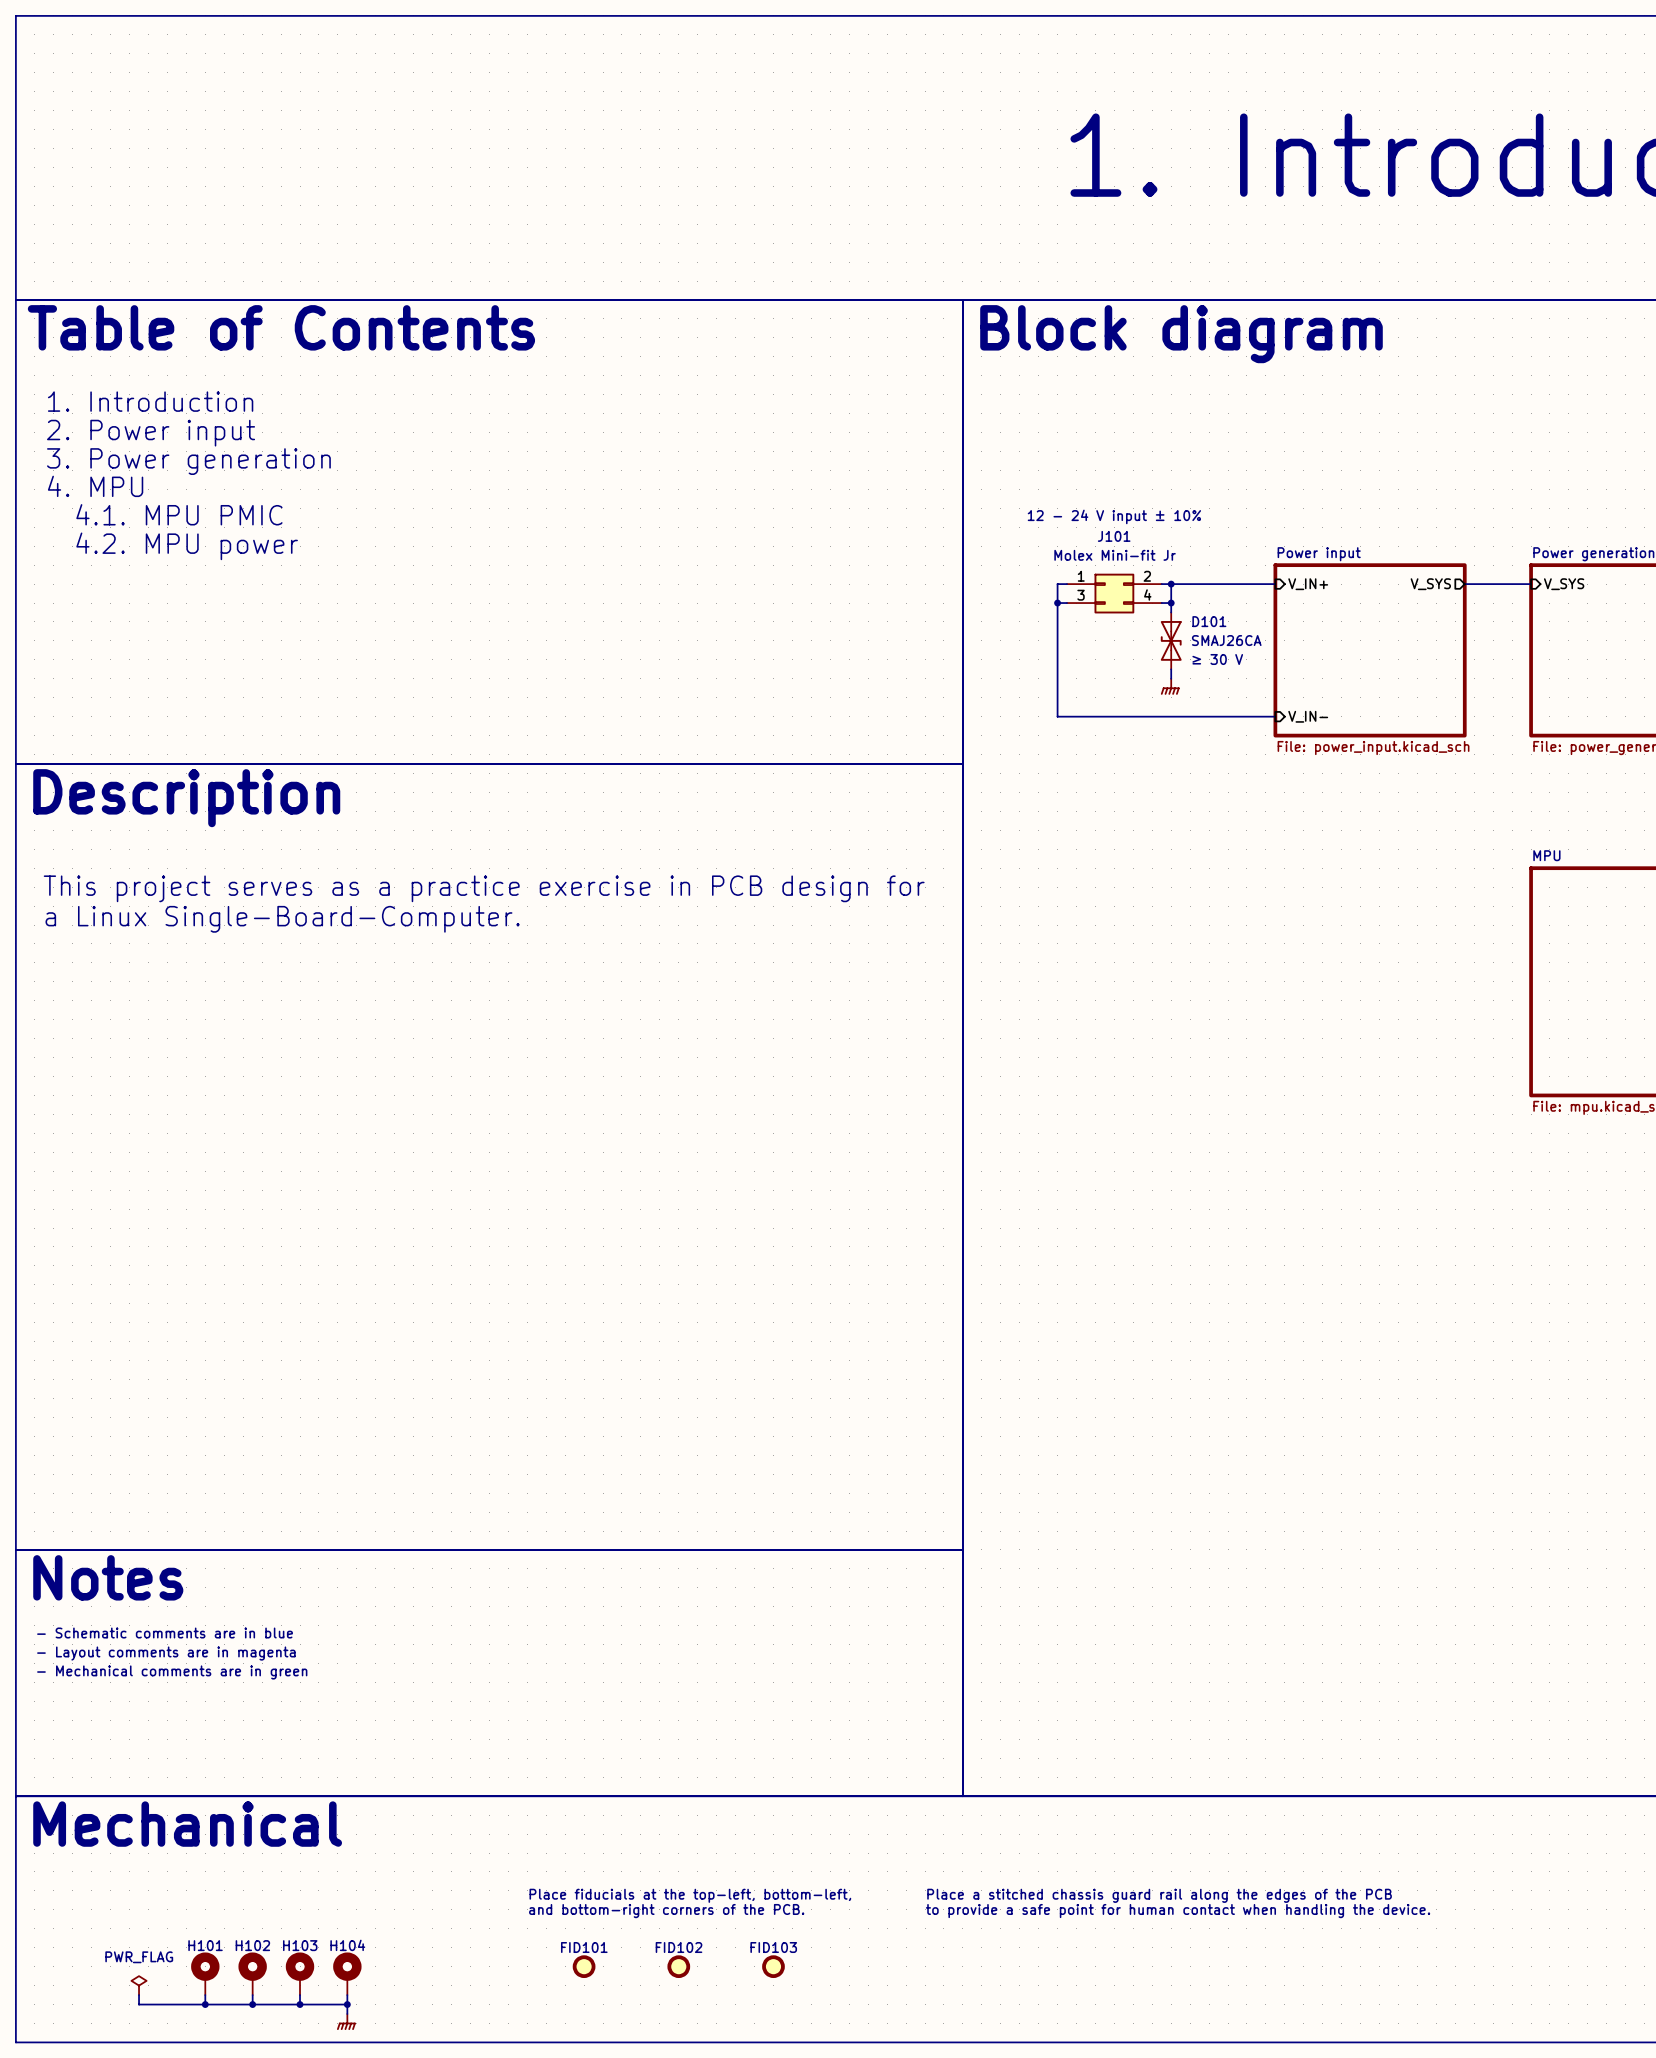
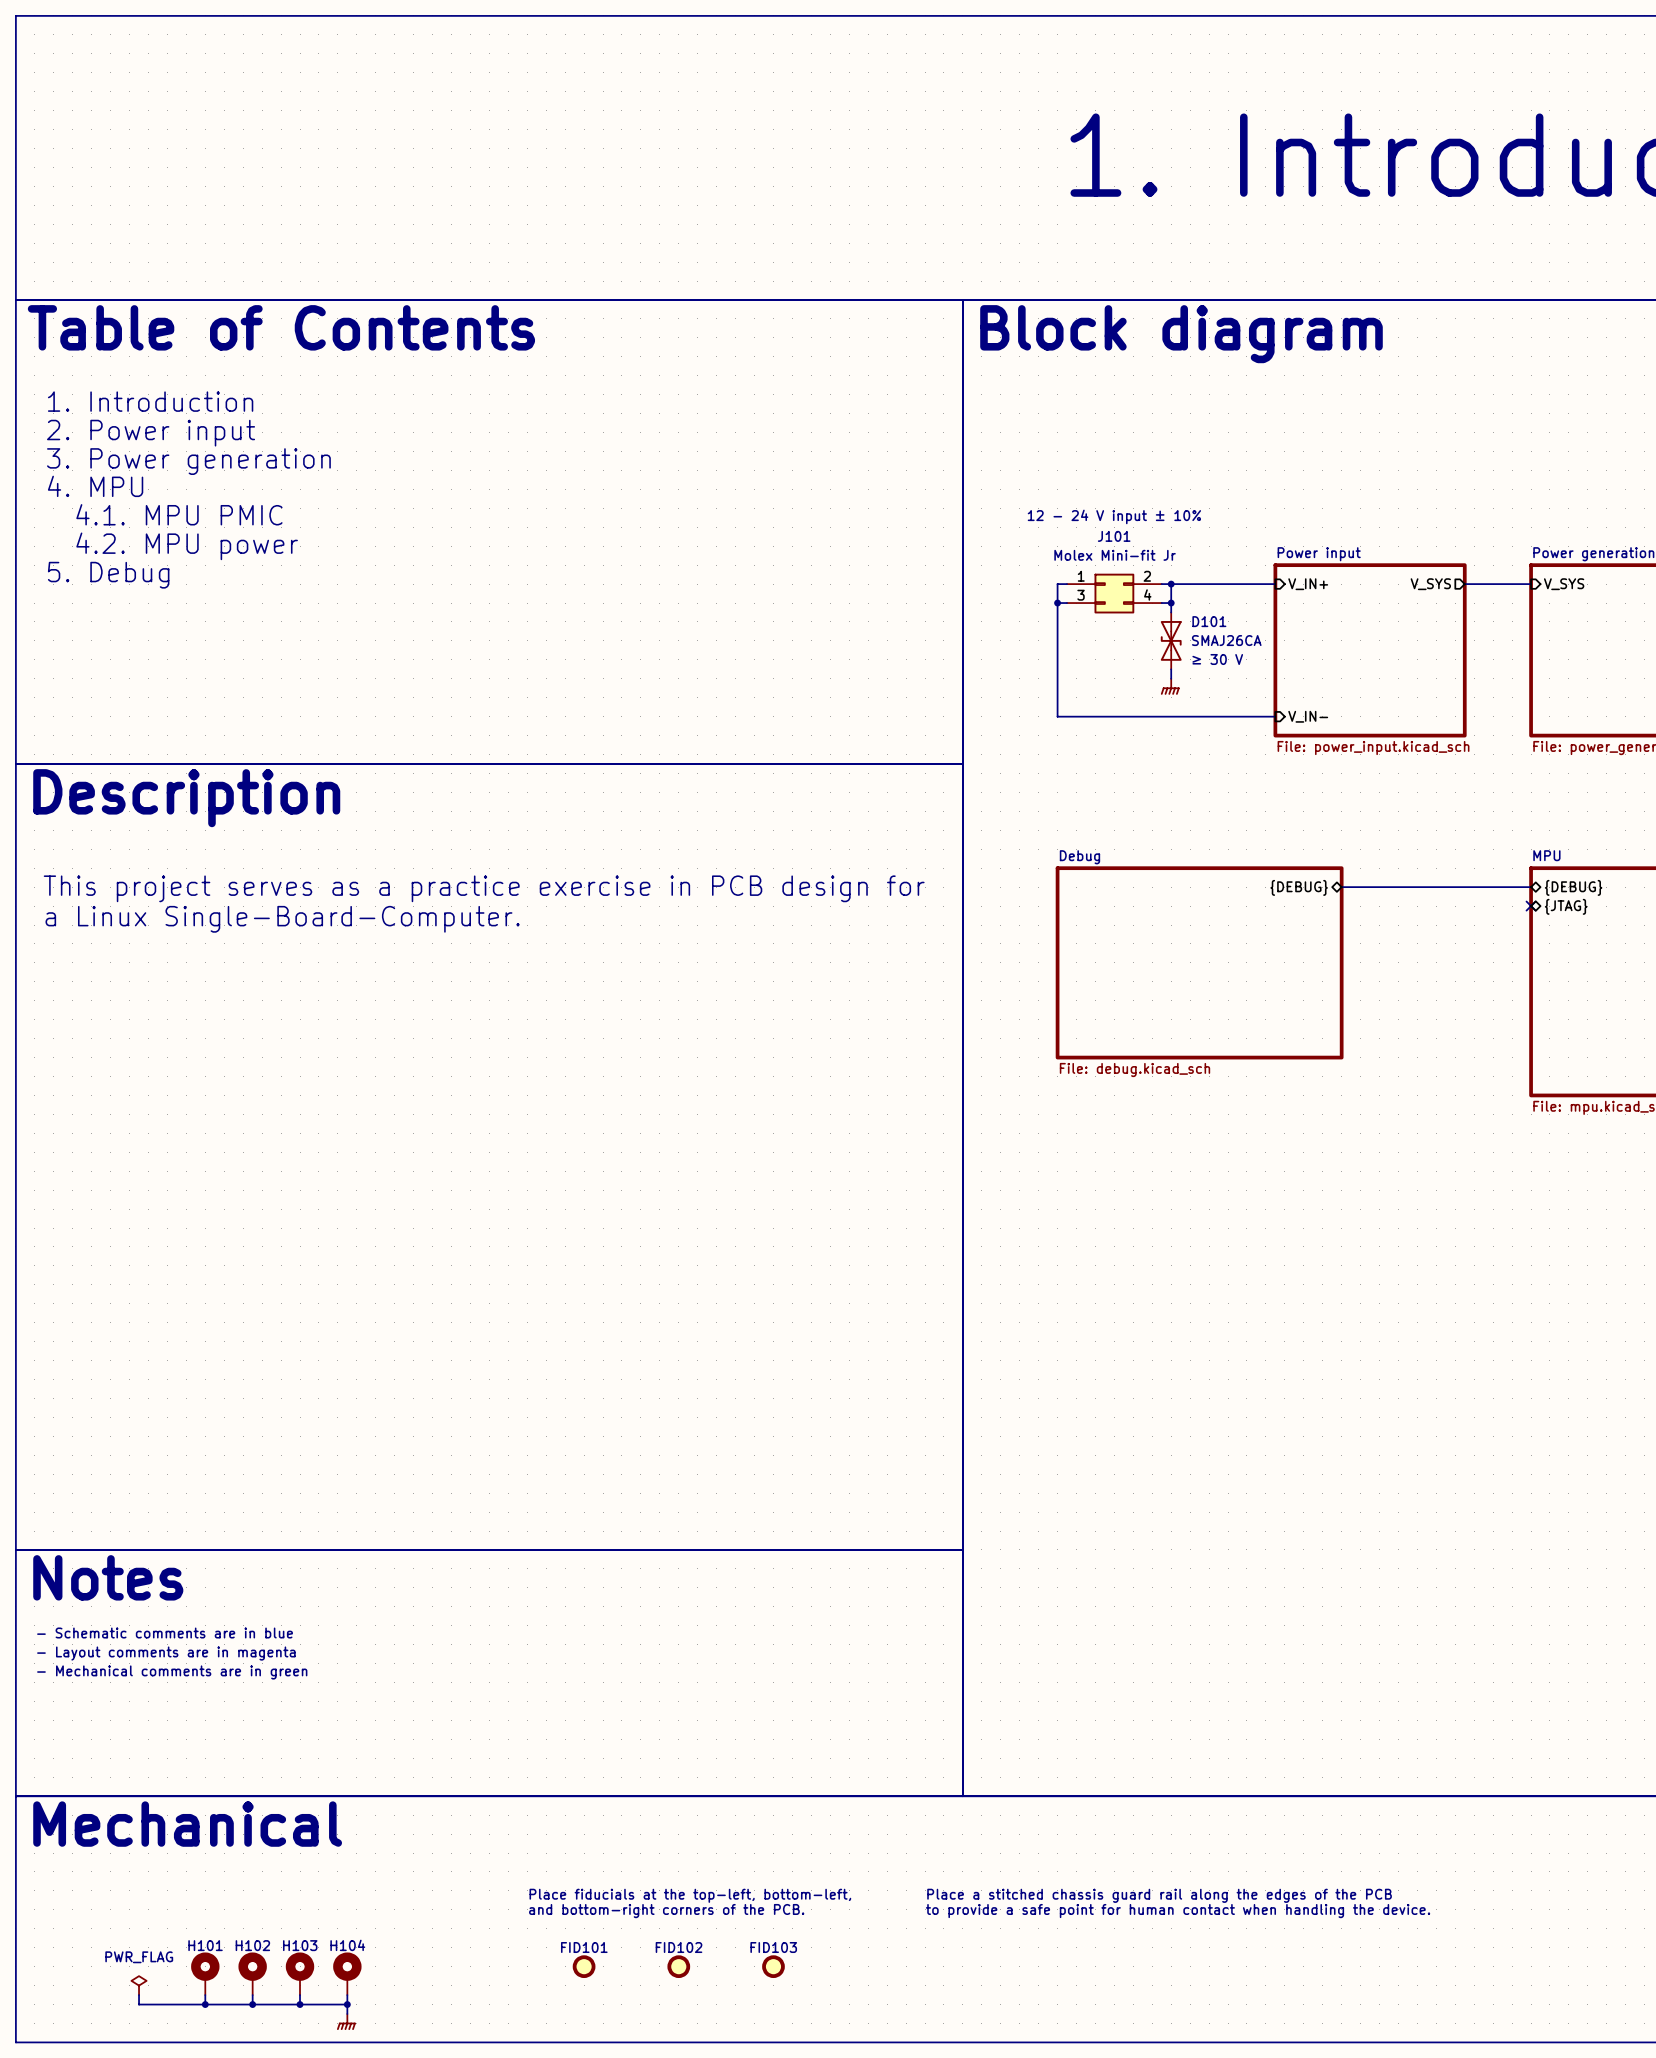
text: none -> 5. Debug (108, 575)
sheet pin: none -> {DEBUG} (1299, 887)
bus: none -> (1341, 887) (1531, 887)
sheet pin: none -> {DEBUG} (1573, 887)
no-connect mark: none -> (1531, 906)
sheet pin: none -> {JTAG} (1566, 906)
sheet Debug: none -> File: debug.kicad_sch (1199, 962)

